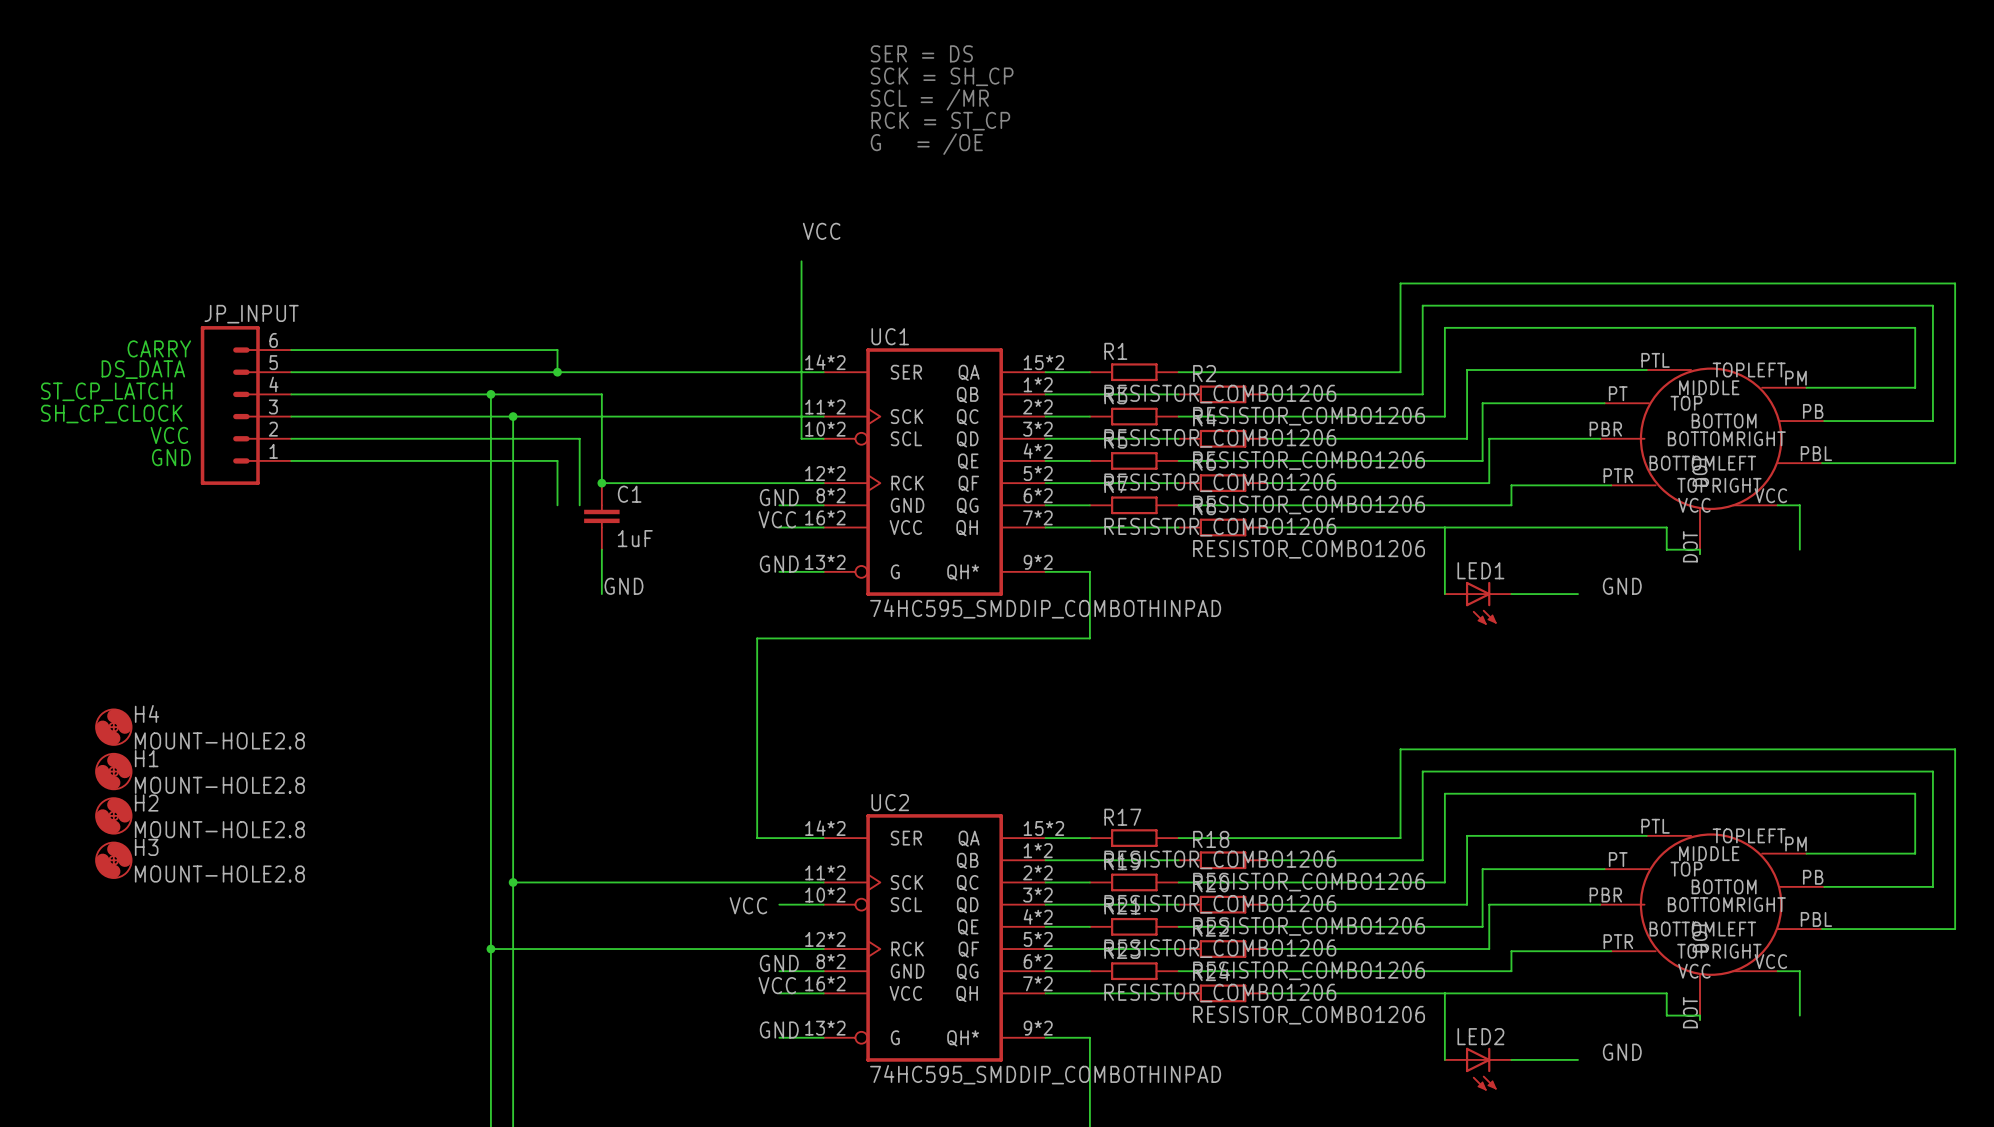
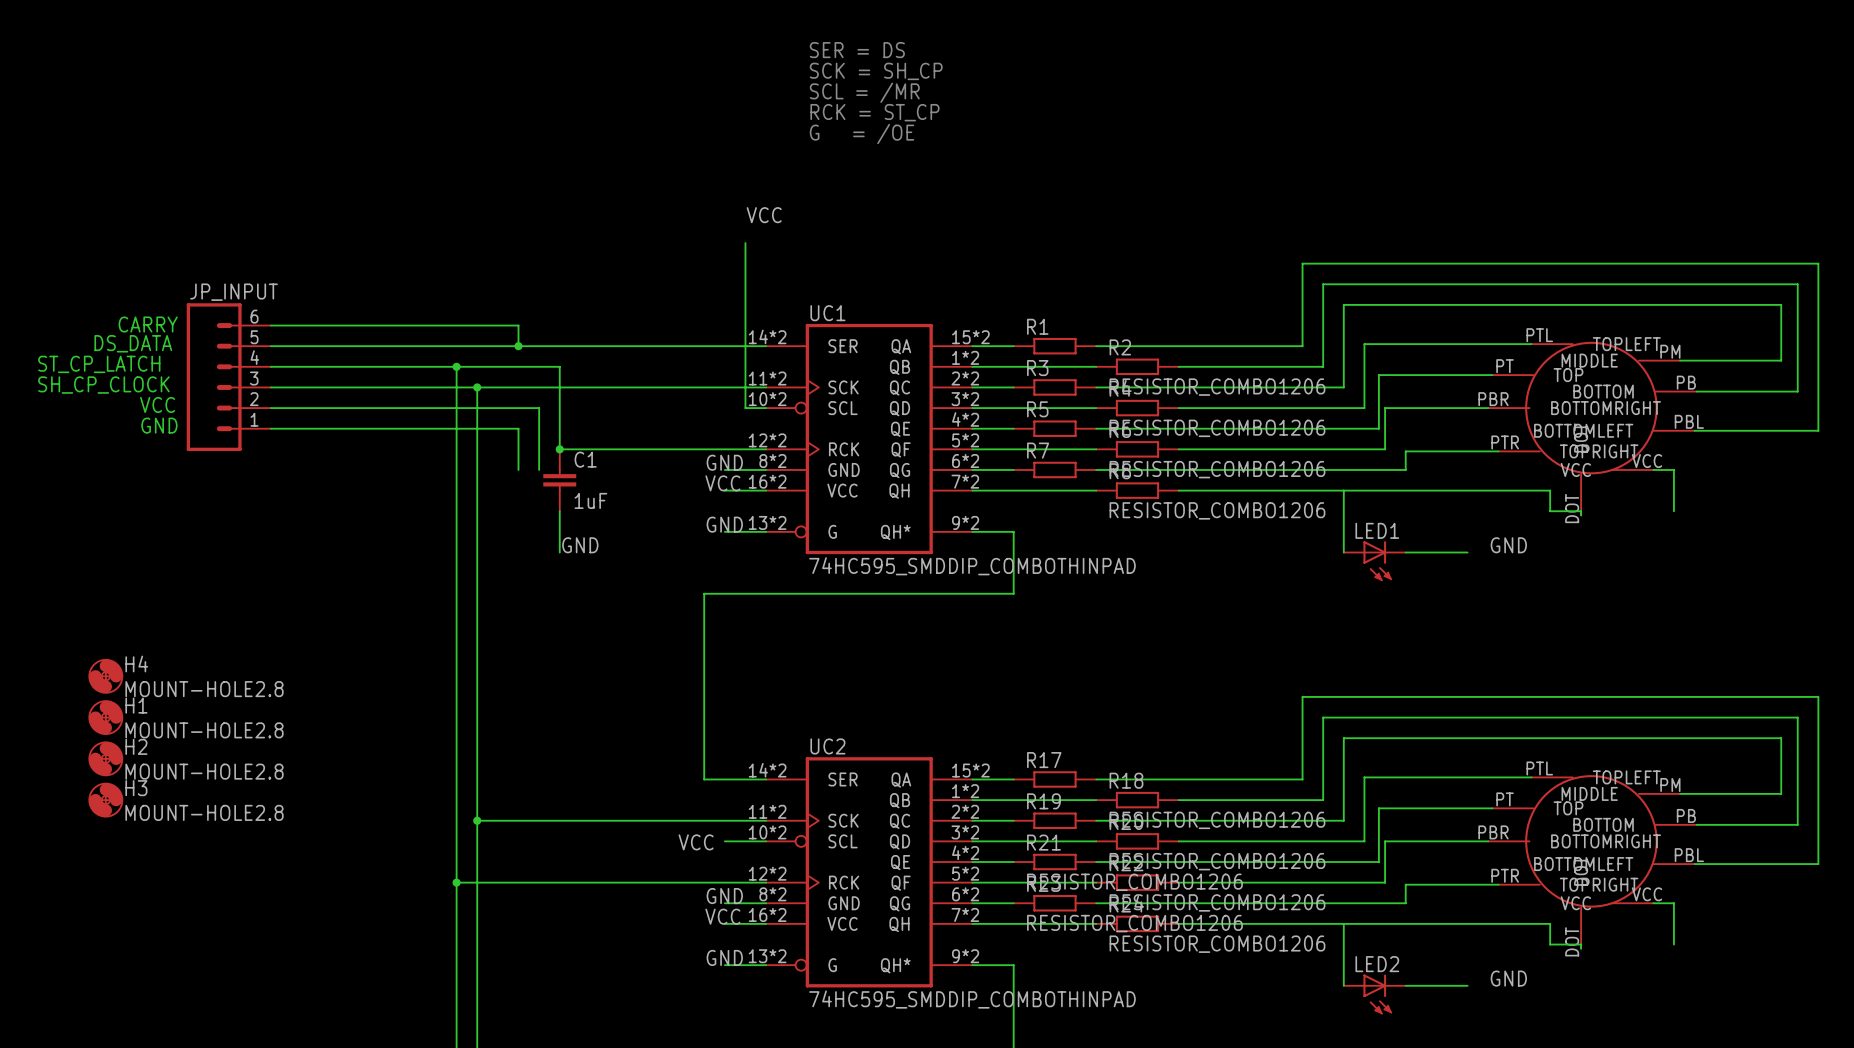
R1 value: RESISTOR_COMBO1206 (1220, 394) -> none
R3 value: RESISTOR_COMBO1206 (1220, 438) -> none
R5 value: RESISTOR_COMBO1206 (1220, 482) -> none
R7 value: RESISTOR_COMBO1206 (1220, 527) -> none
R17 value: RESISTOR_COMBO1206 (1220, 859) -> none
R19 value: RESISTOR_COMBO1206 (1220, 904) -> none

